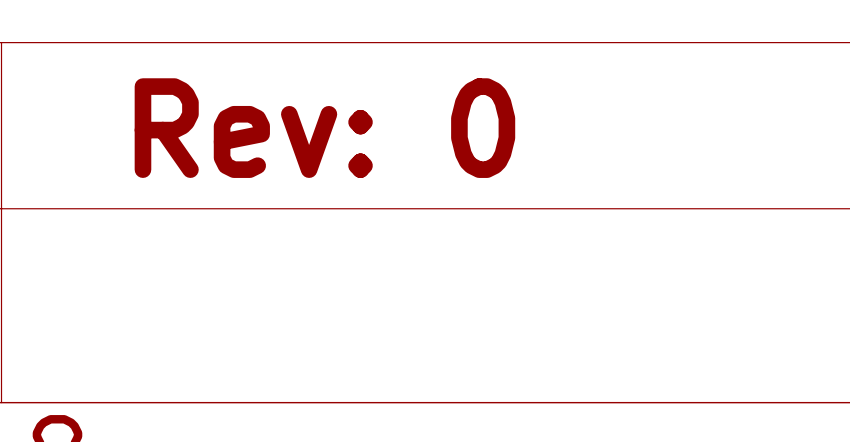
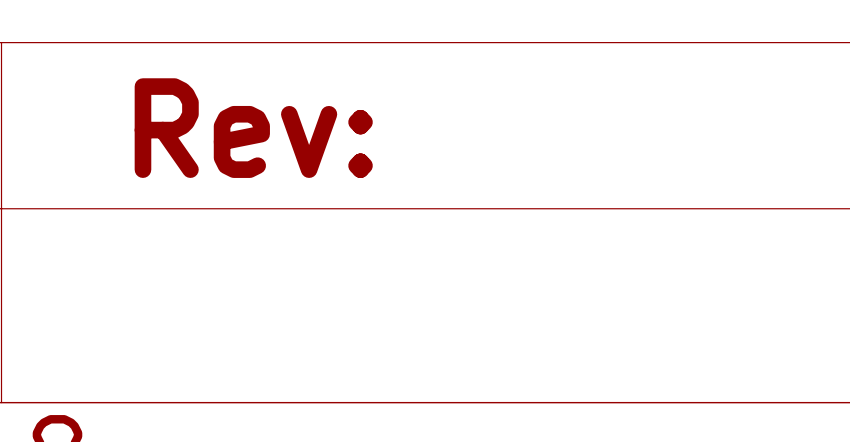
title block: Rev: 0 (324, 128) -> Rev: (253, 128)

